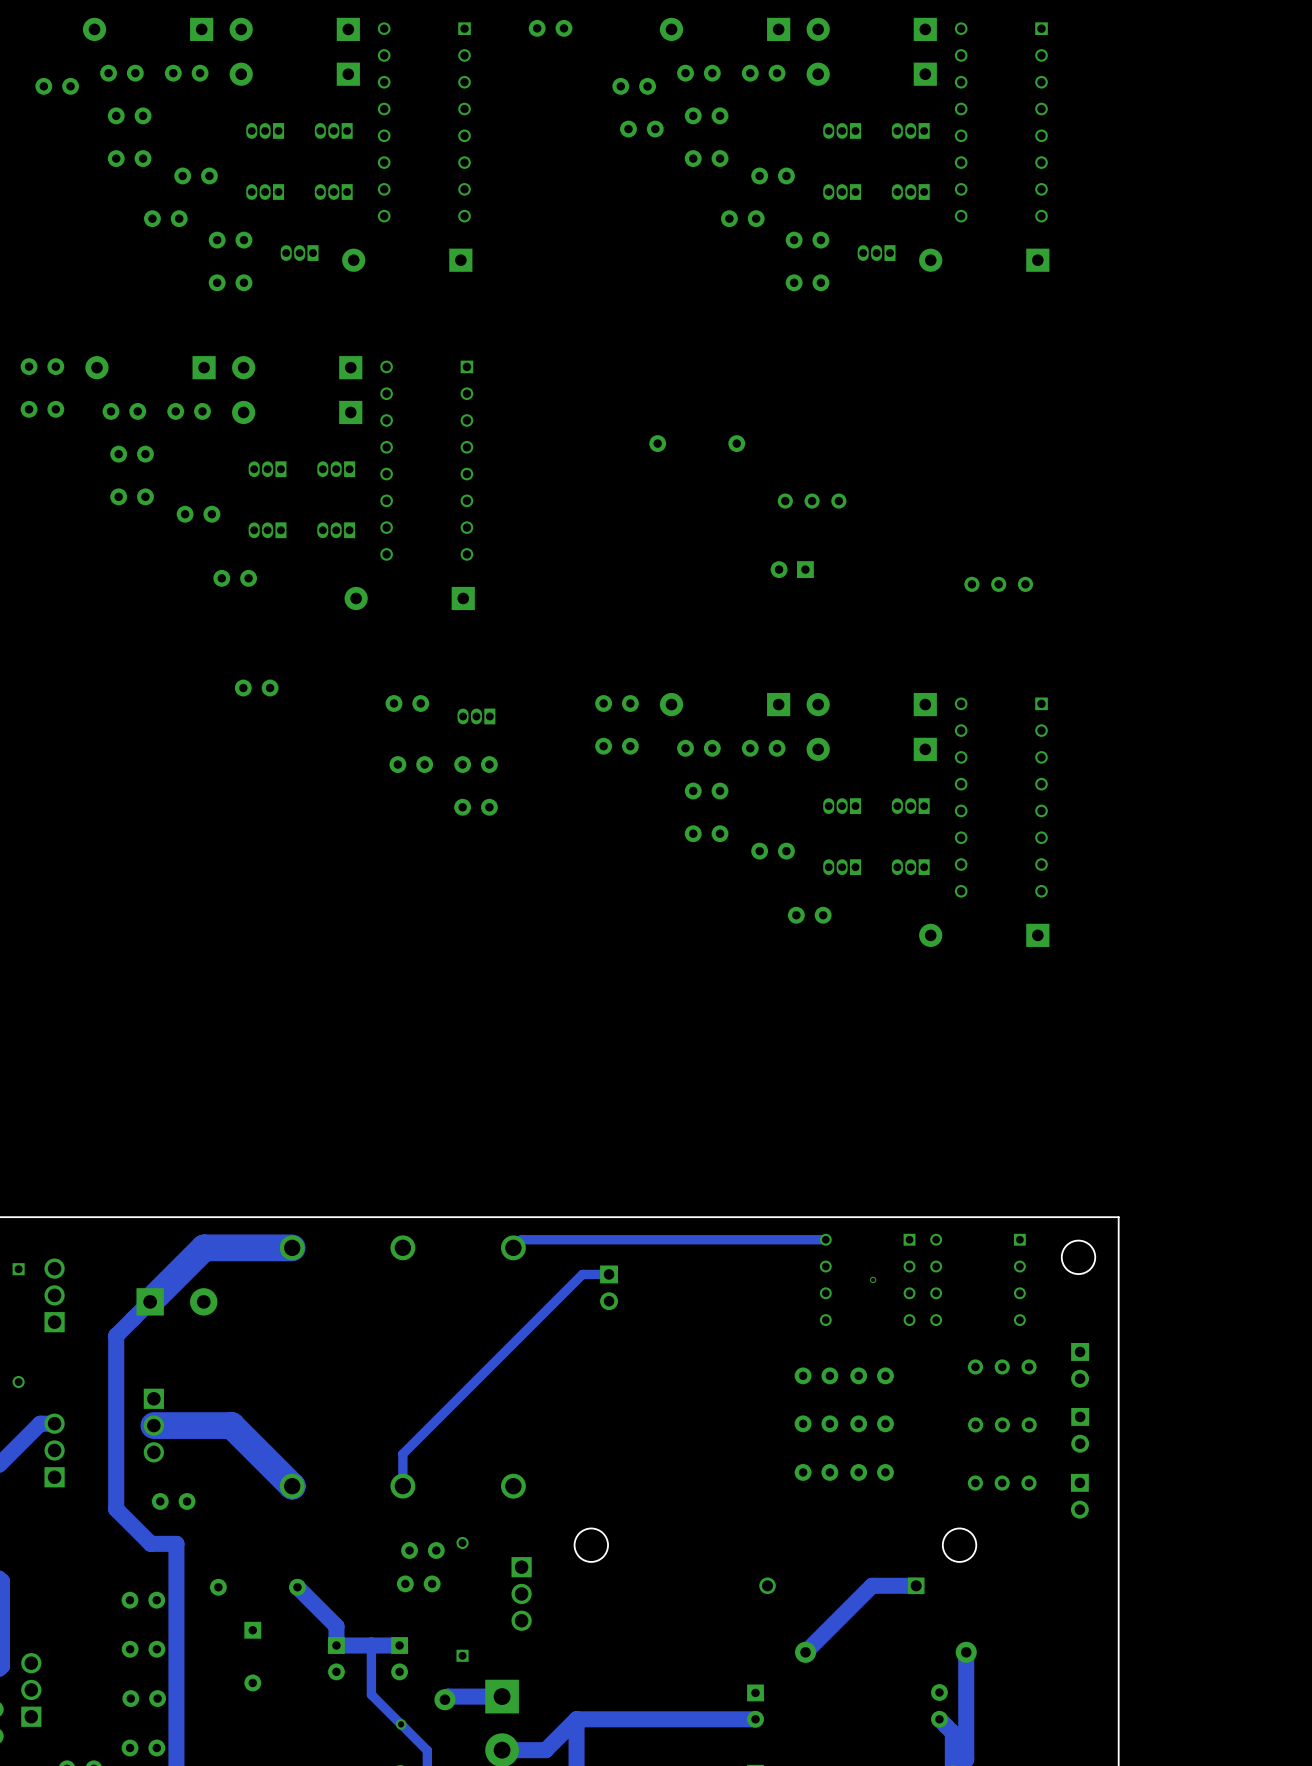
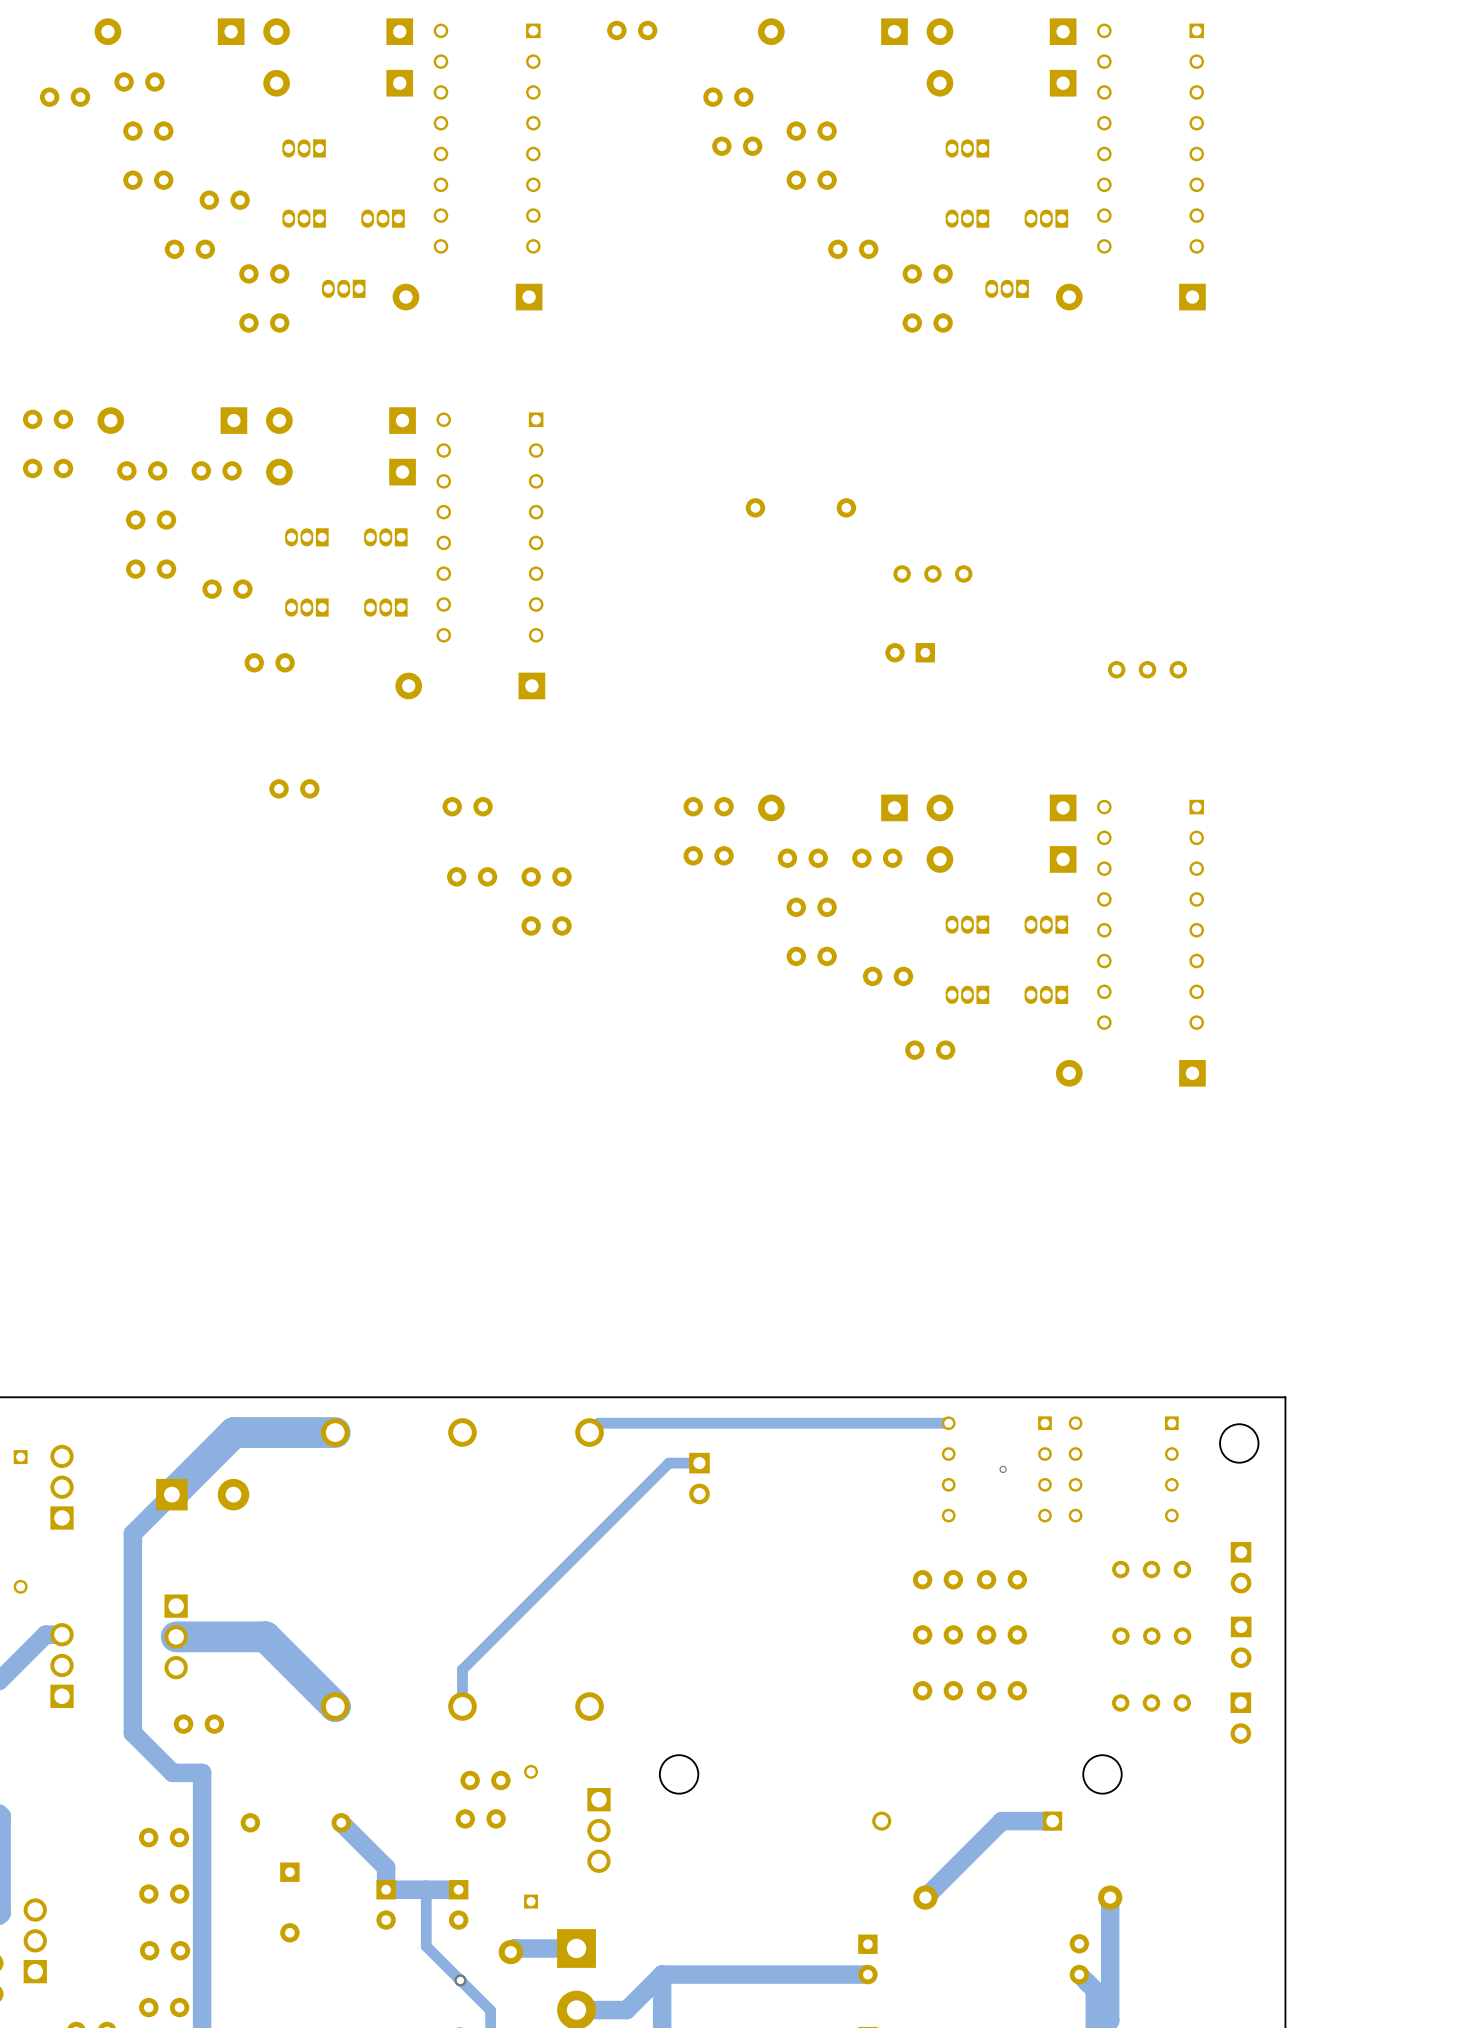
part: (186, 73) -> none
part: (698, 73) -> none
part: (763, 73) -> none
part: (333, 130) -> none
part: (910, 130) -> none
part: (773, 175) -> none
part: (476, 716) -> none

